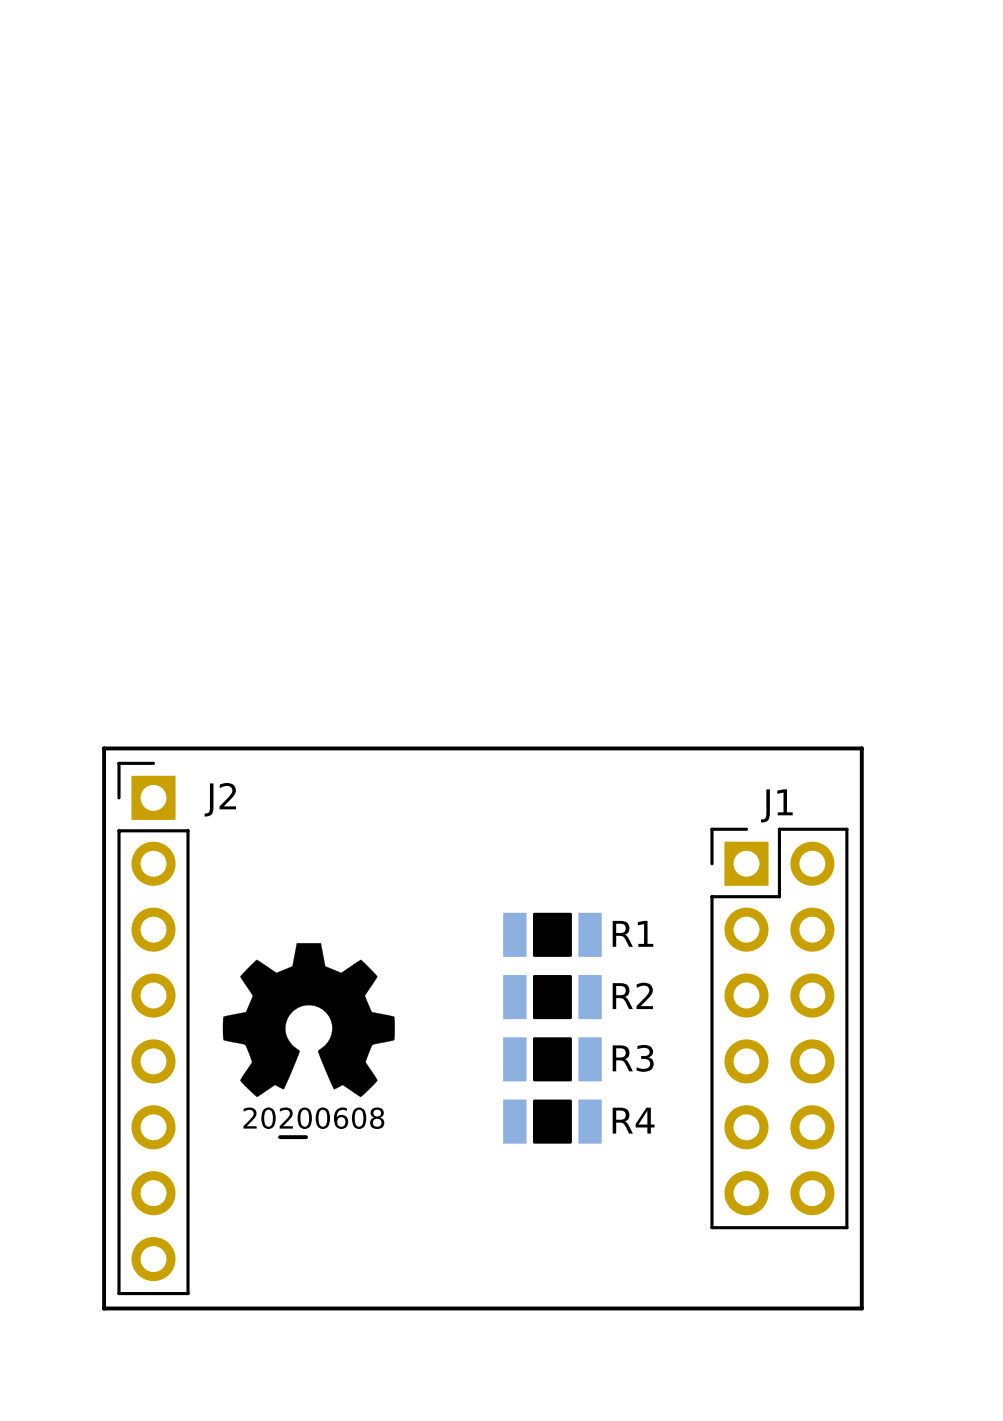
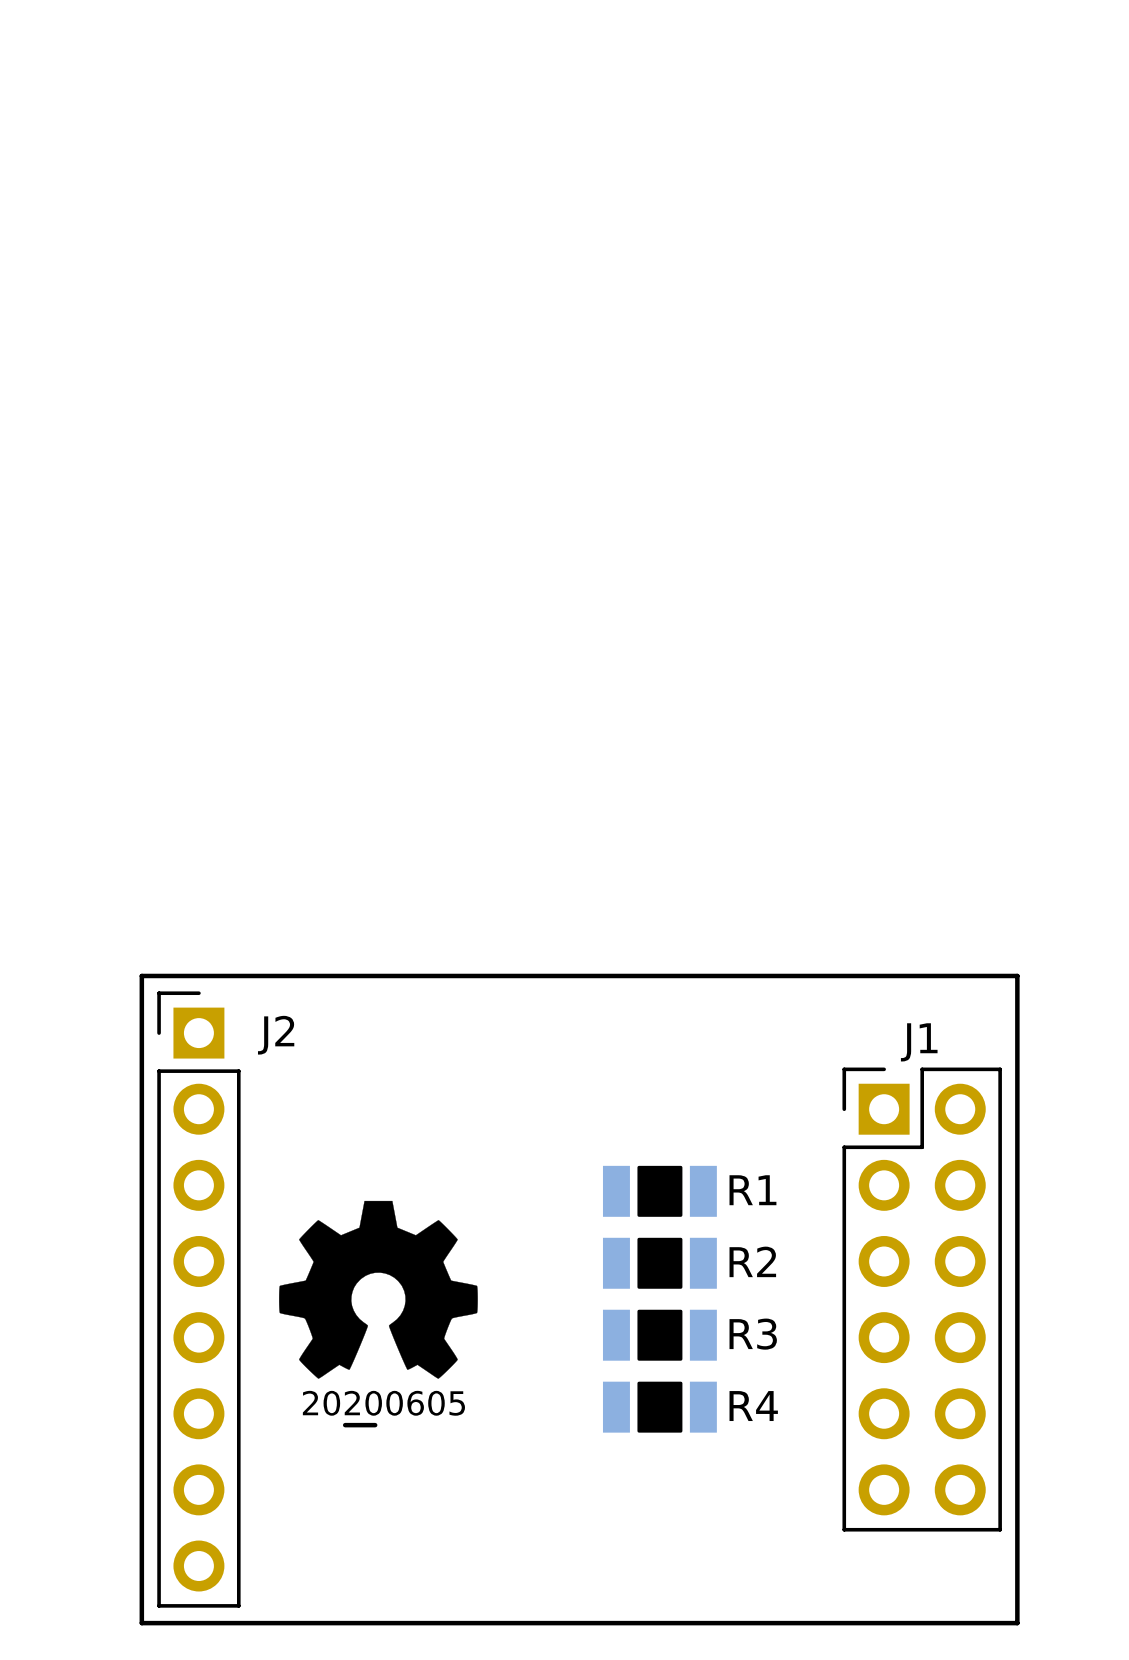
drawing shape: [243, 1107, 385, 1140] -> [302, 1390, 465, 1428]

